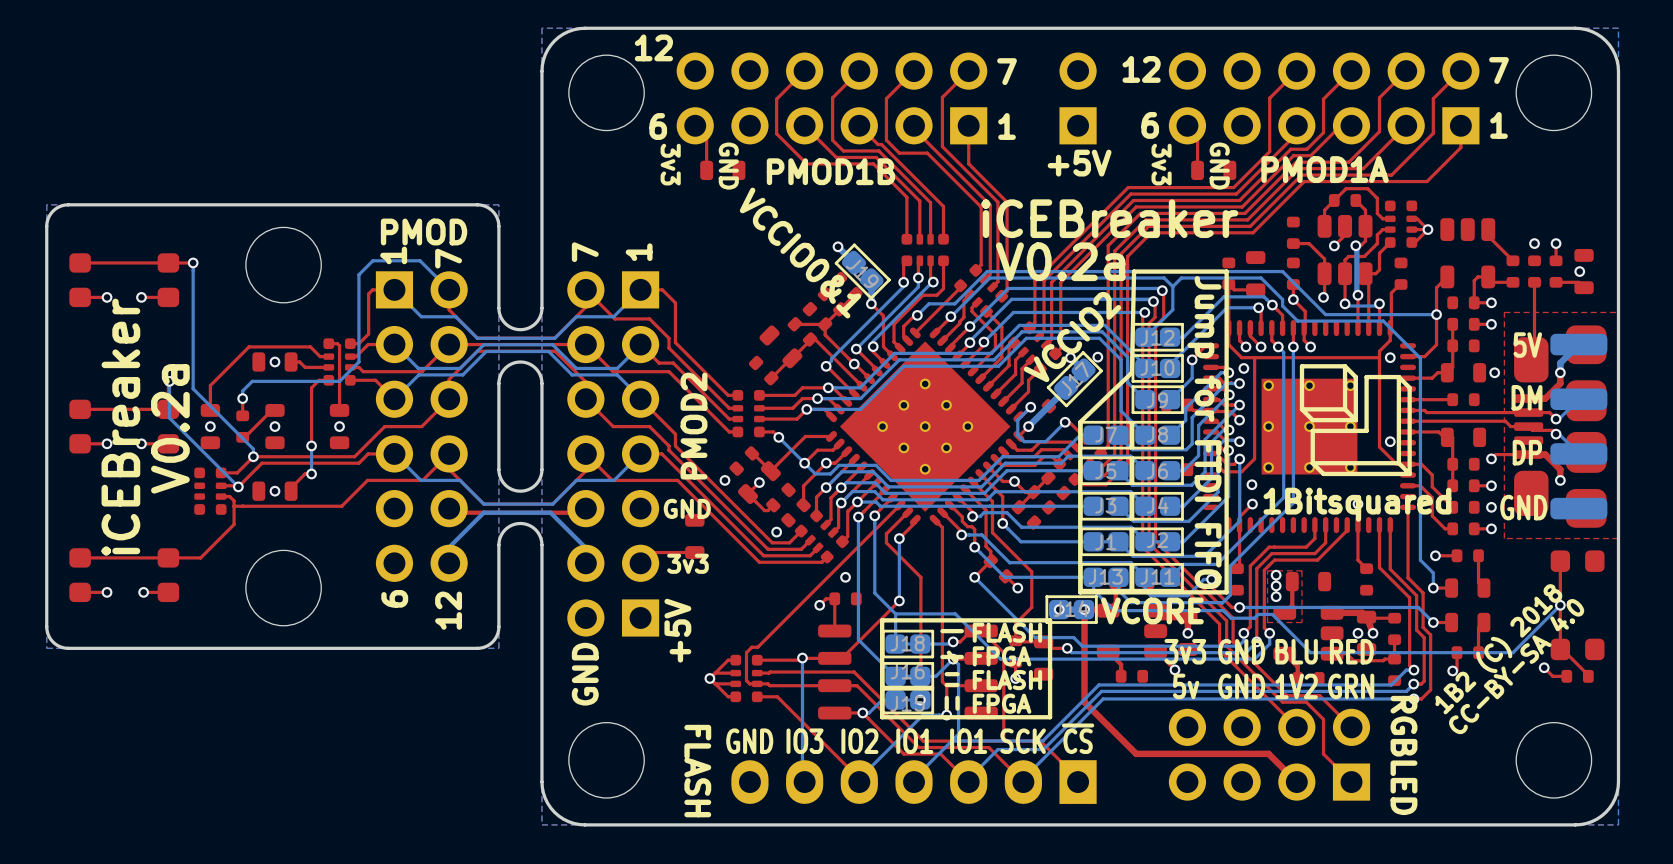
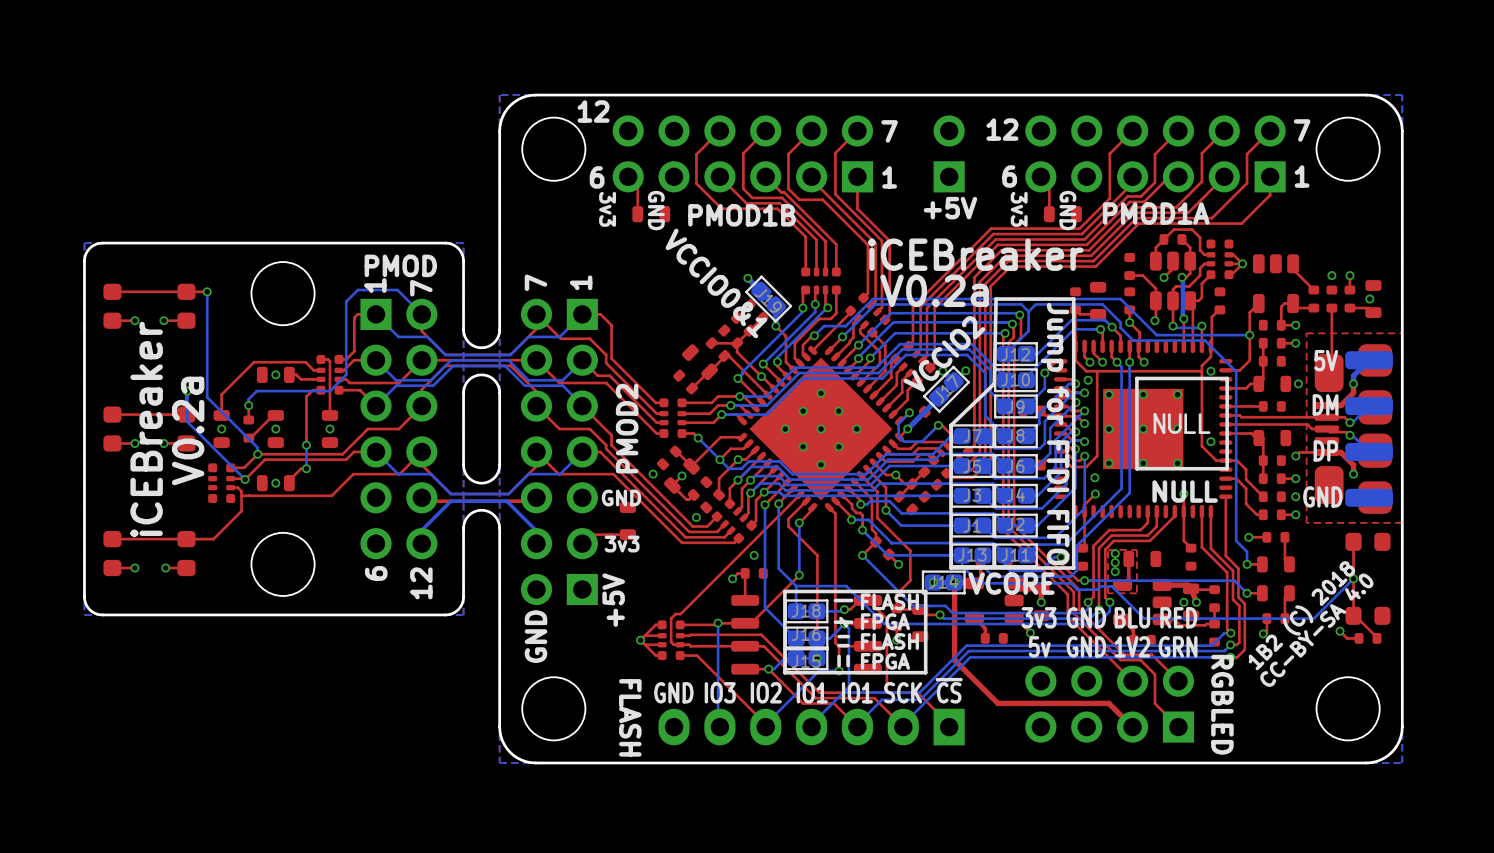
drawing shape: [1299, 364, 1412, 477] -> [1135, 376, 1229, 471]
text: 1Bitsquared (1357, 504) -> NULL (1185, 491)

